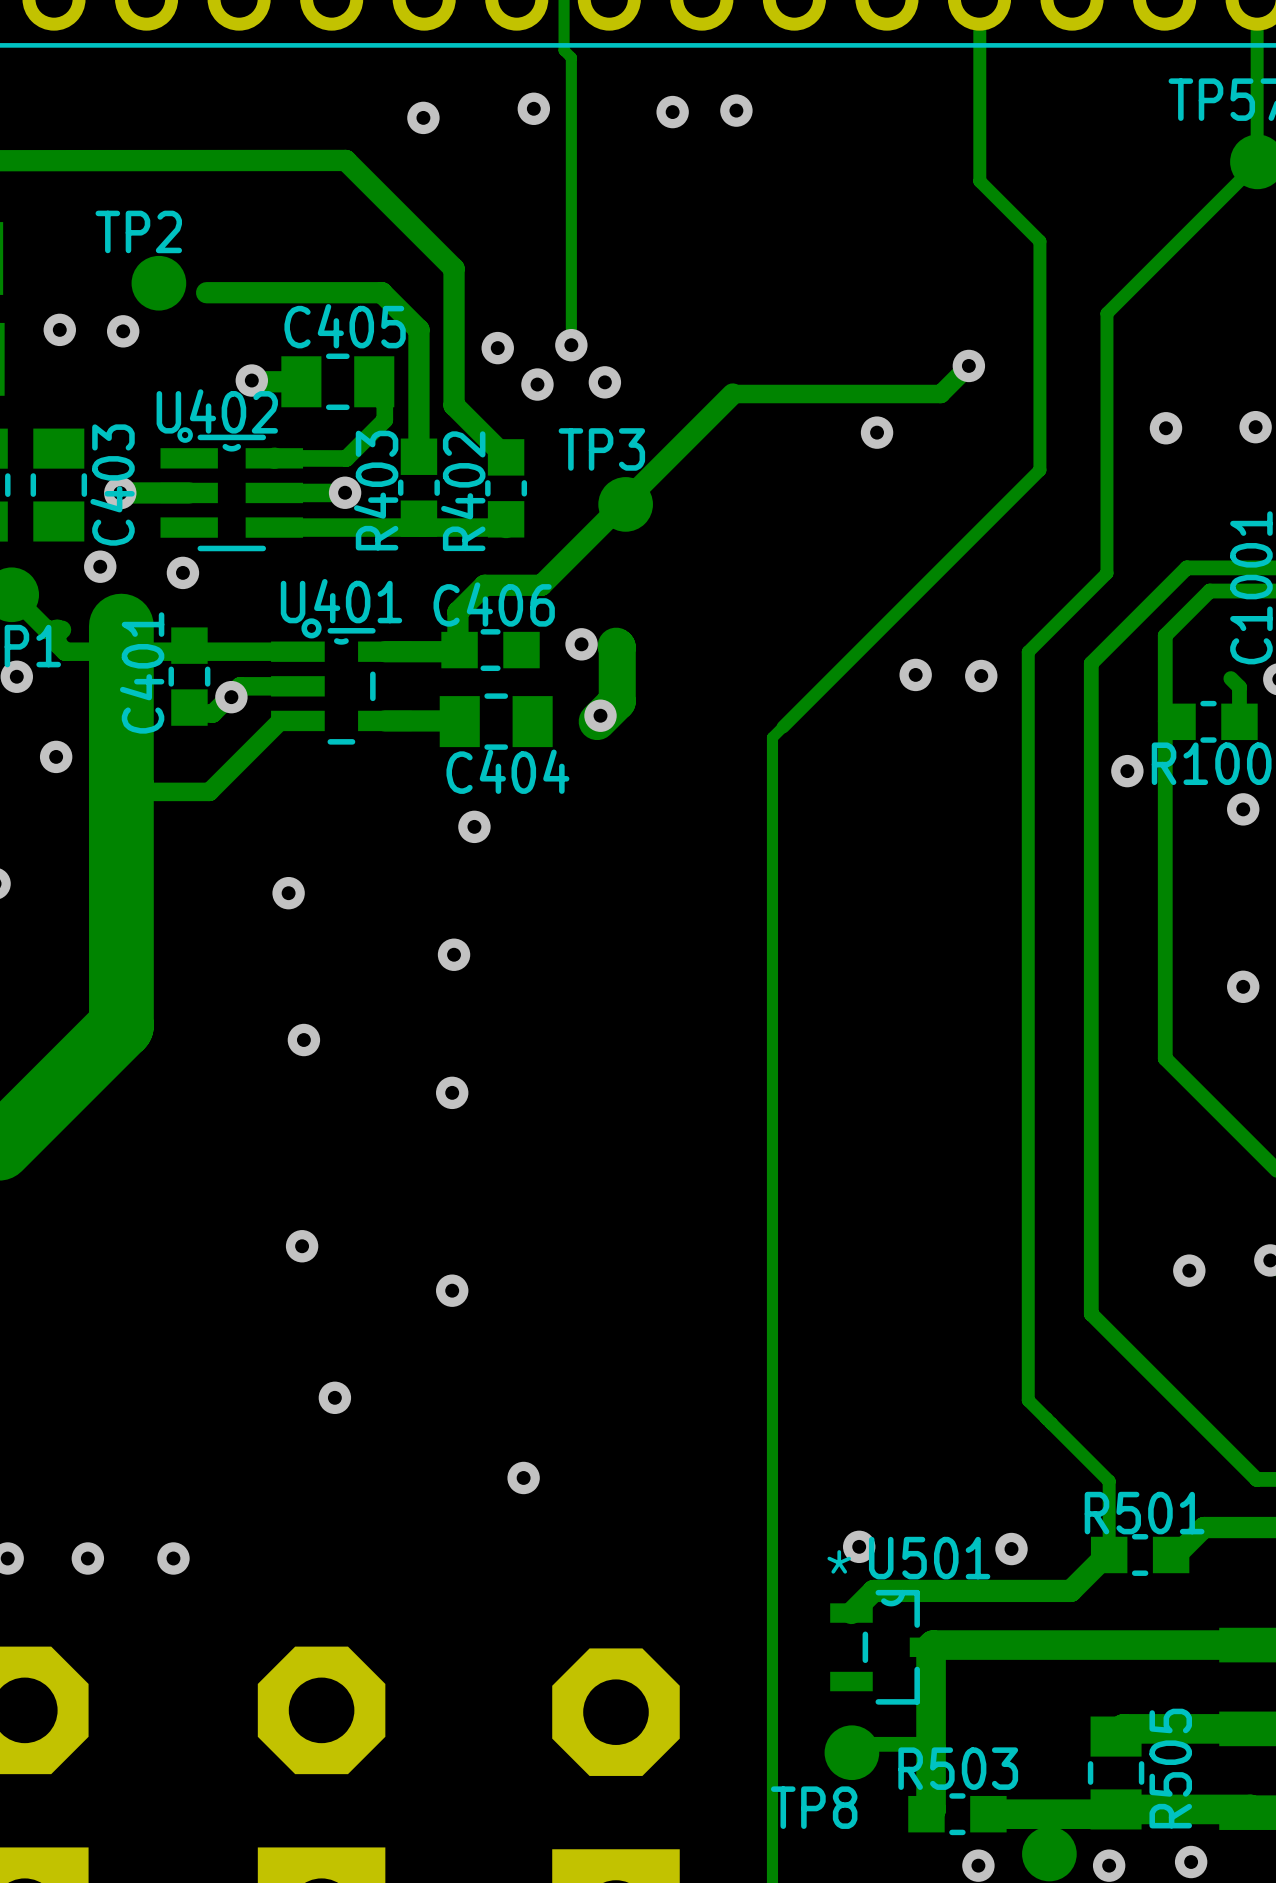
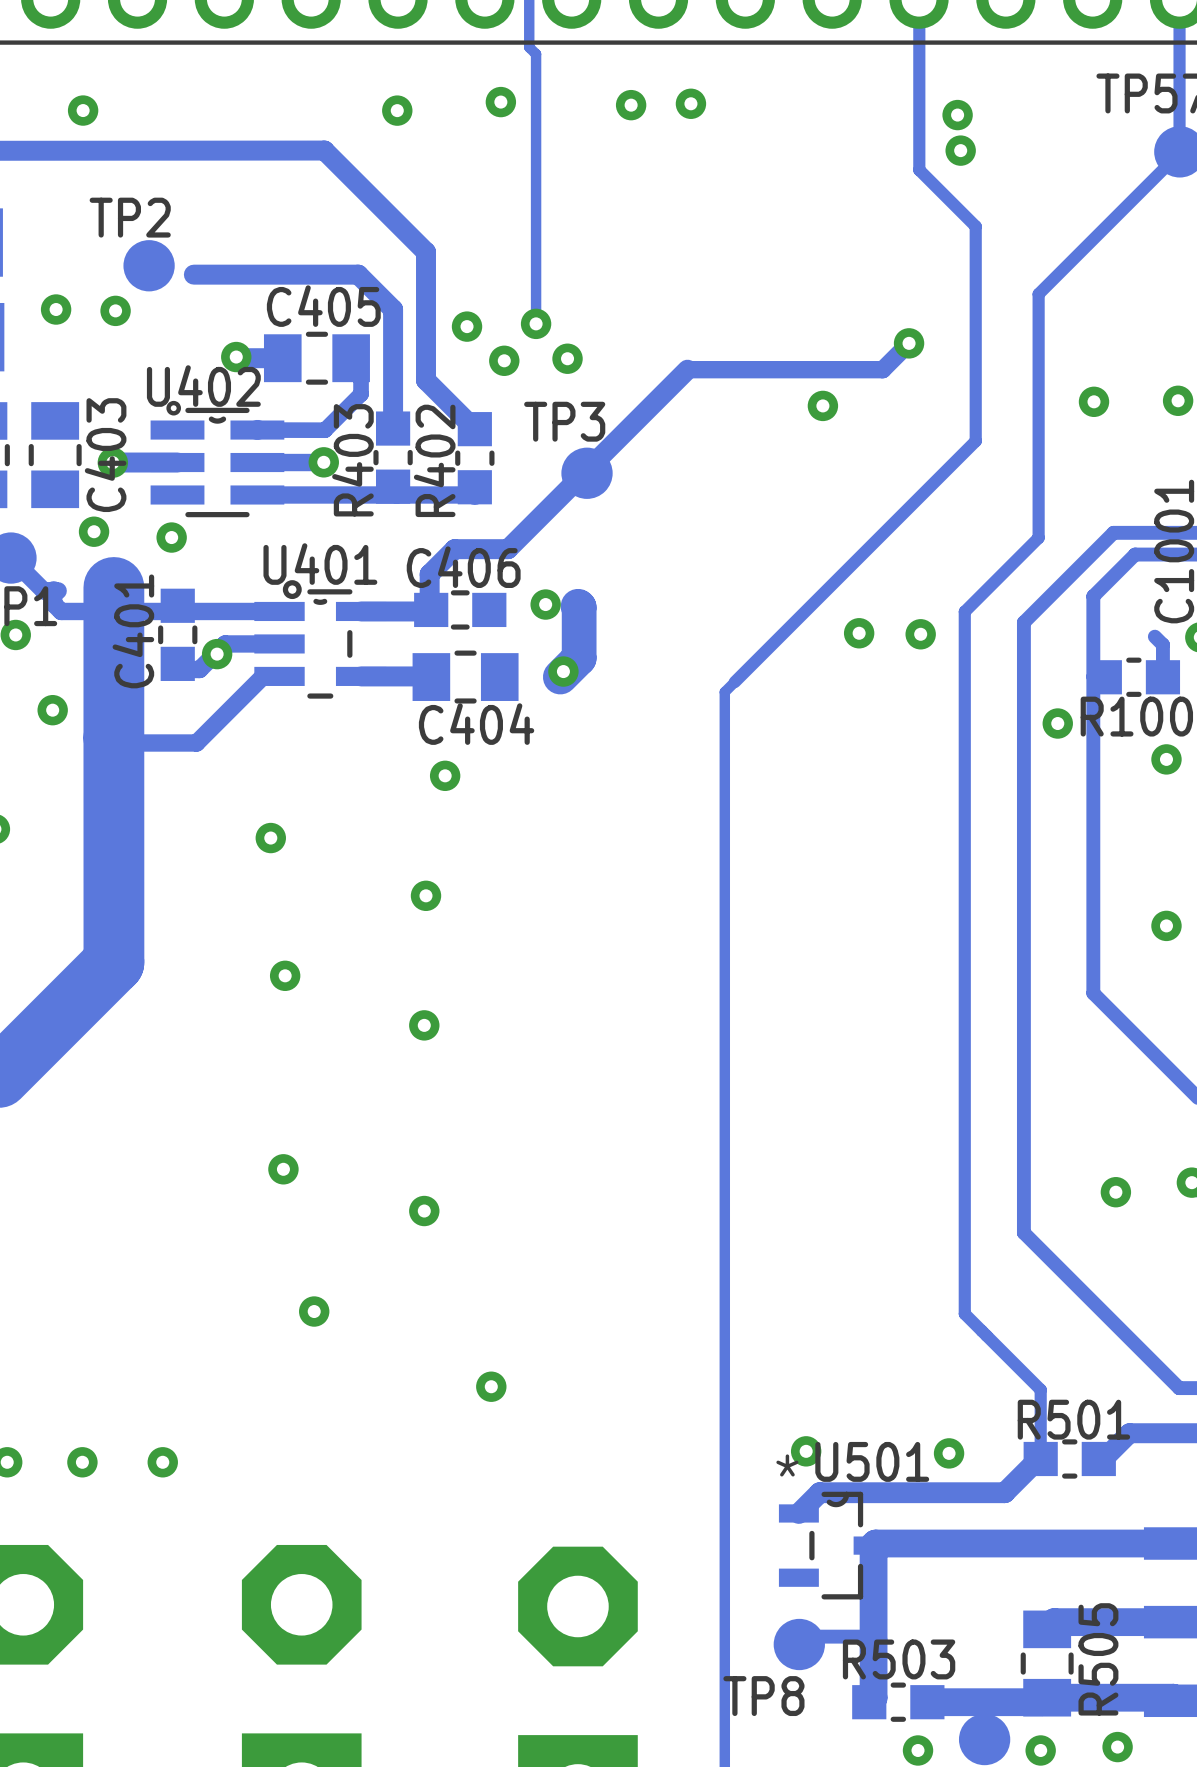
via: none -> (83, 110)
via: none -> (957, 115)
via: none -> (960, 150)

